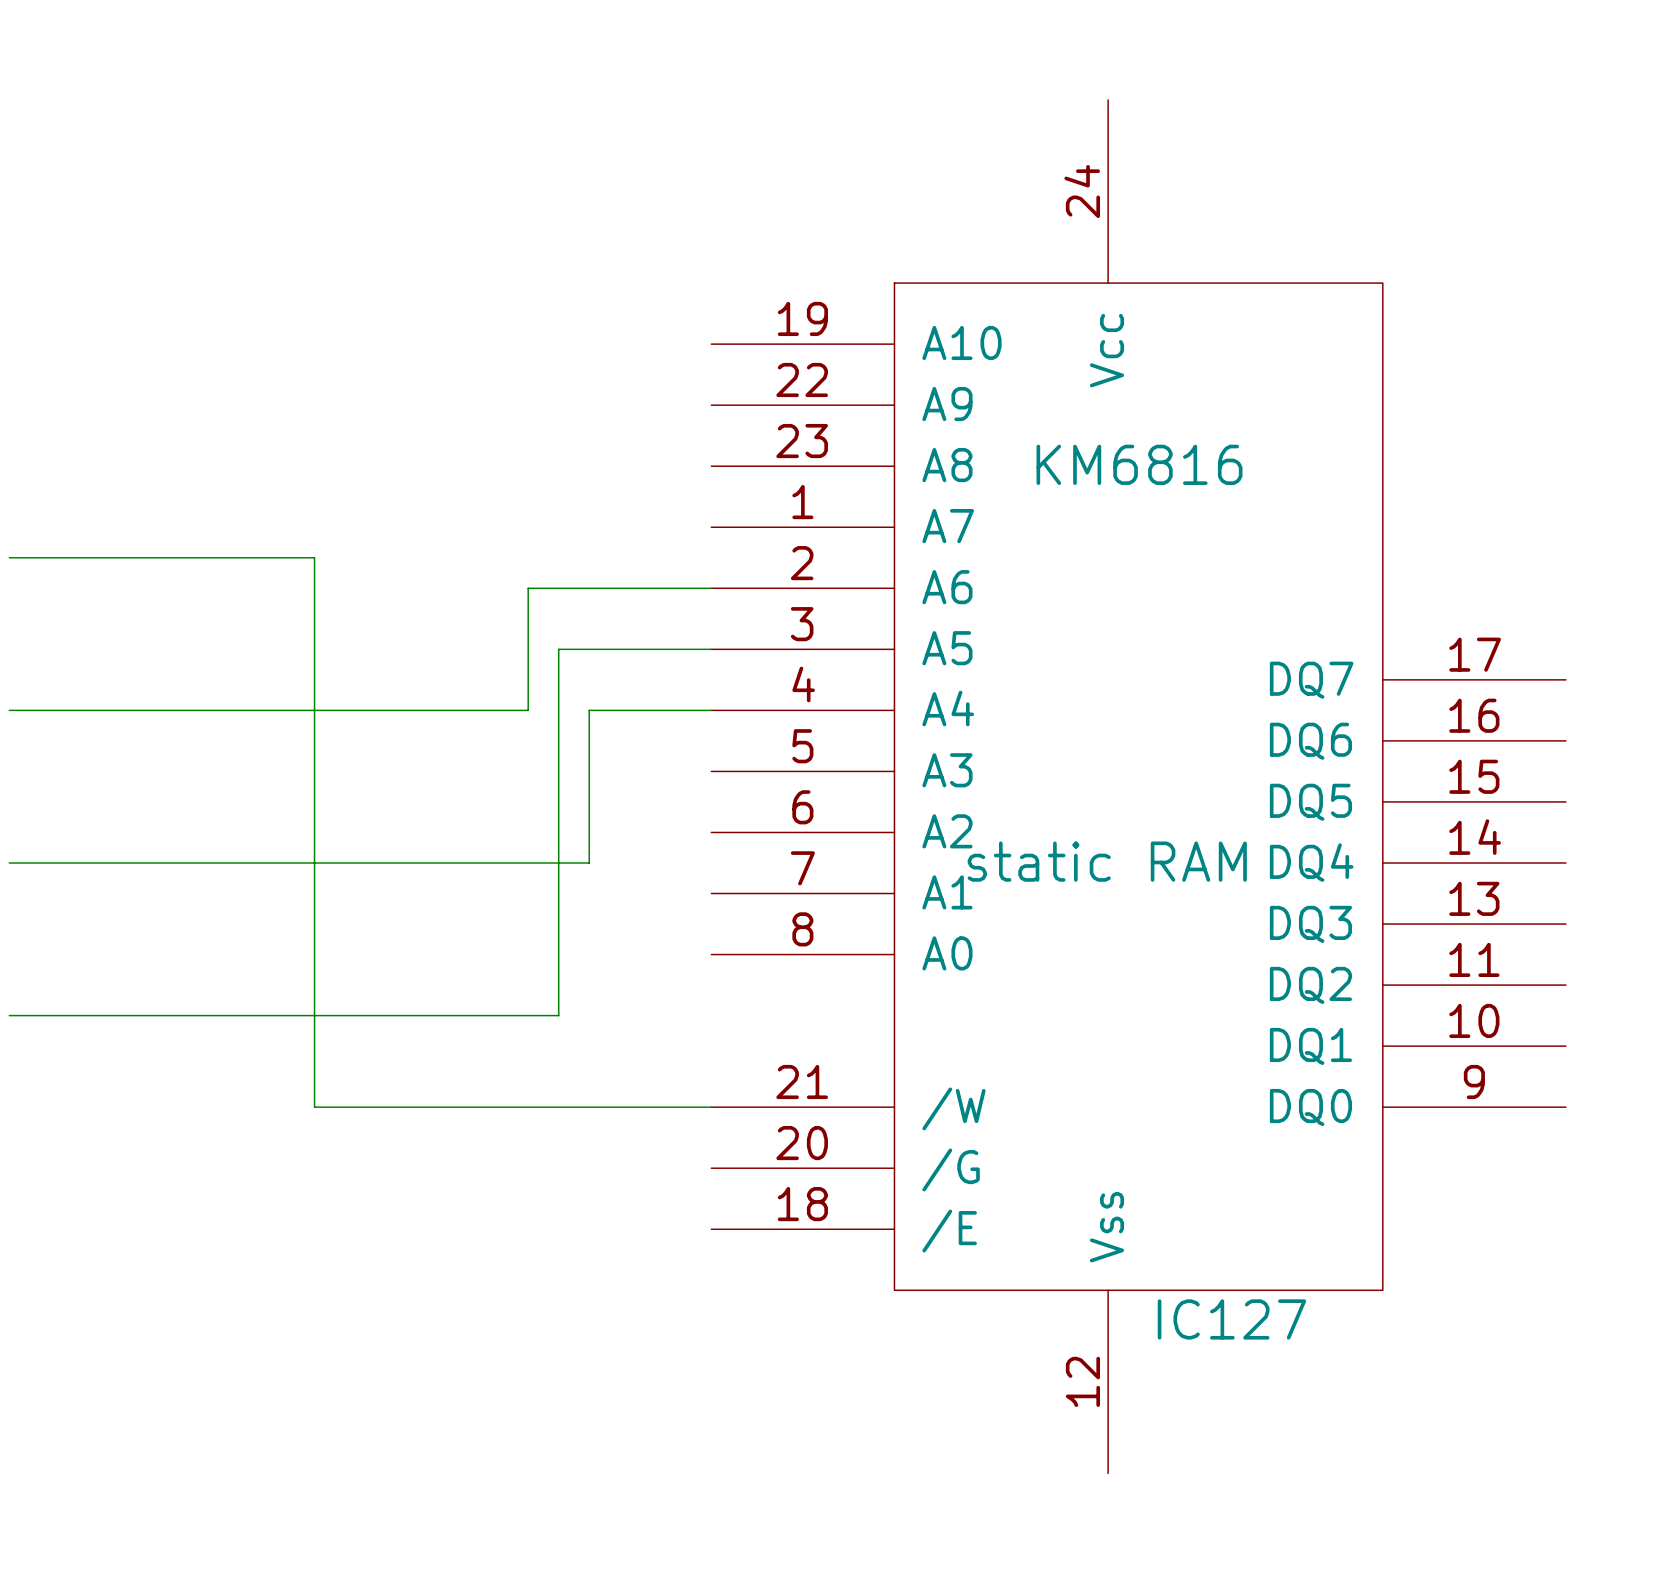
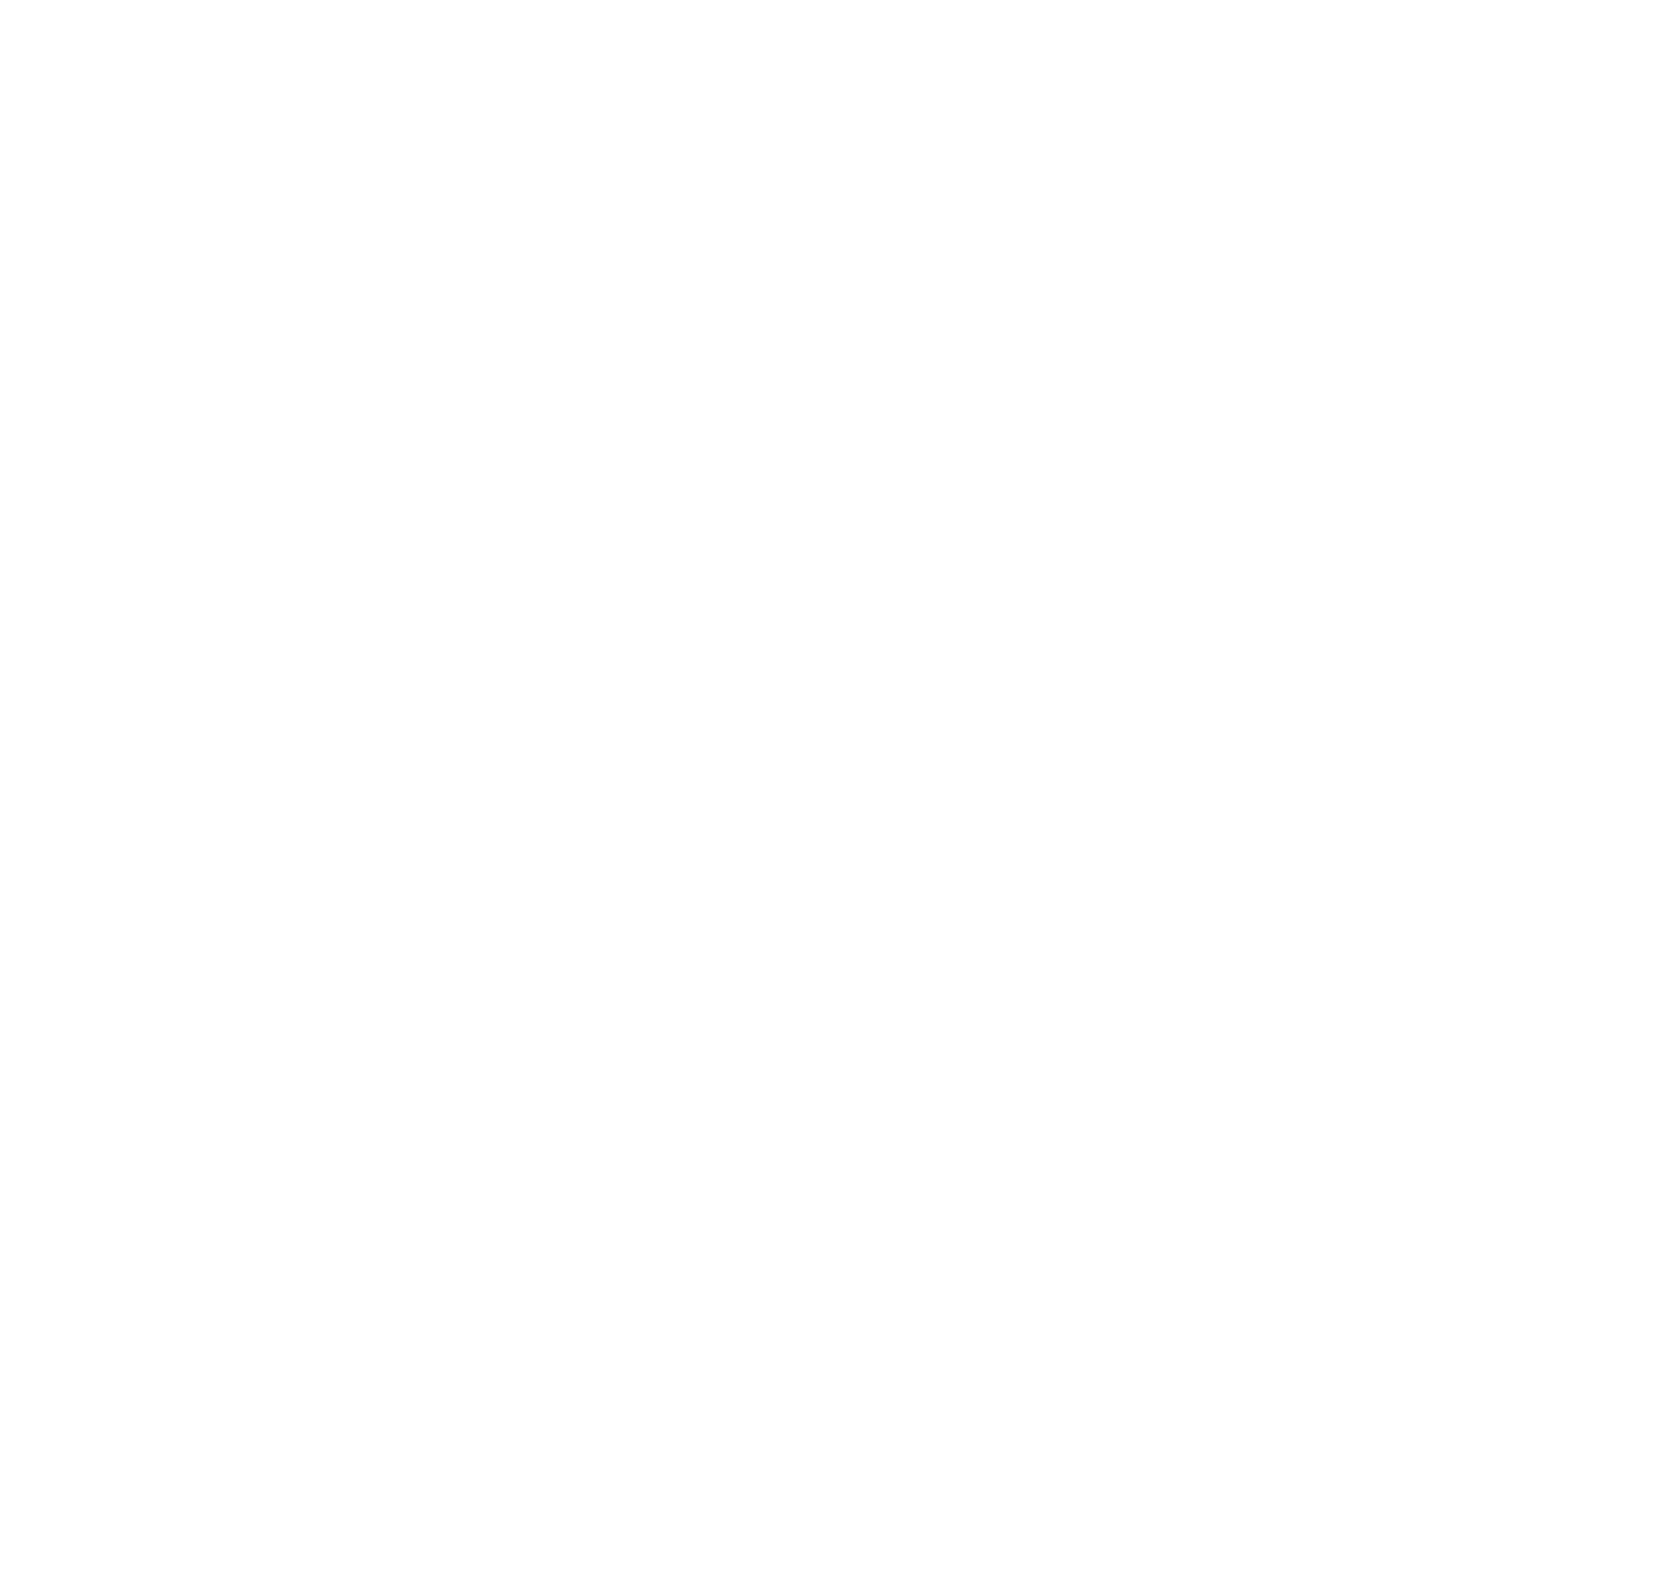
wire: (9, 557) (314, 557) (314, 1107) (711, 1107) -> none
wire: (711, 588) (528, 588) (528, 710) (9, 710) -> none
wire: (711, 649) (558, 649) (558, 1015) (9, 1015) -> none
wire: (711, 710) (589, 710) (589, 862) (9, 862) -> none
IC127: KM6816 (1138, 786) -> none

